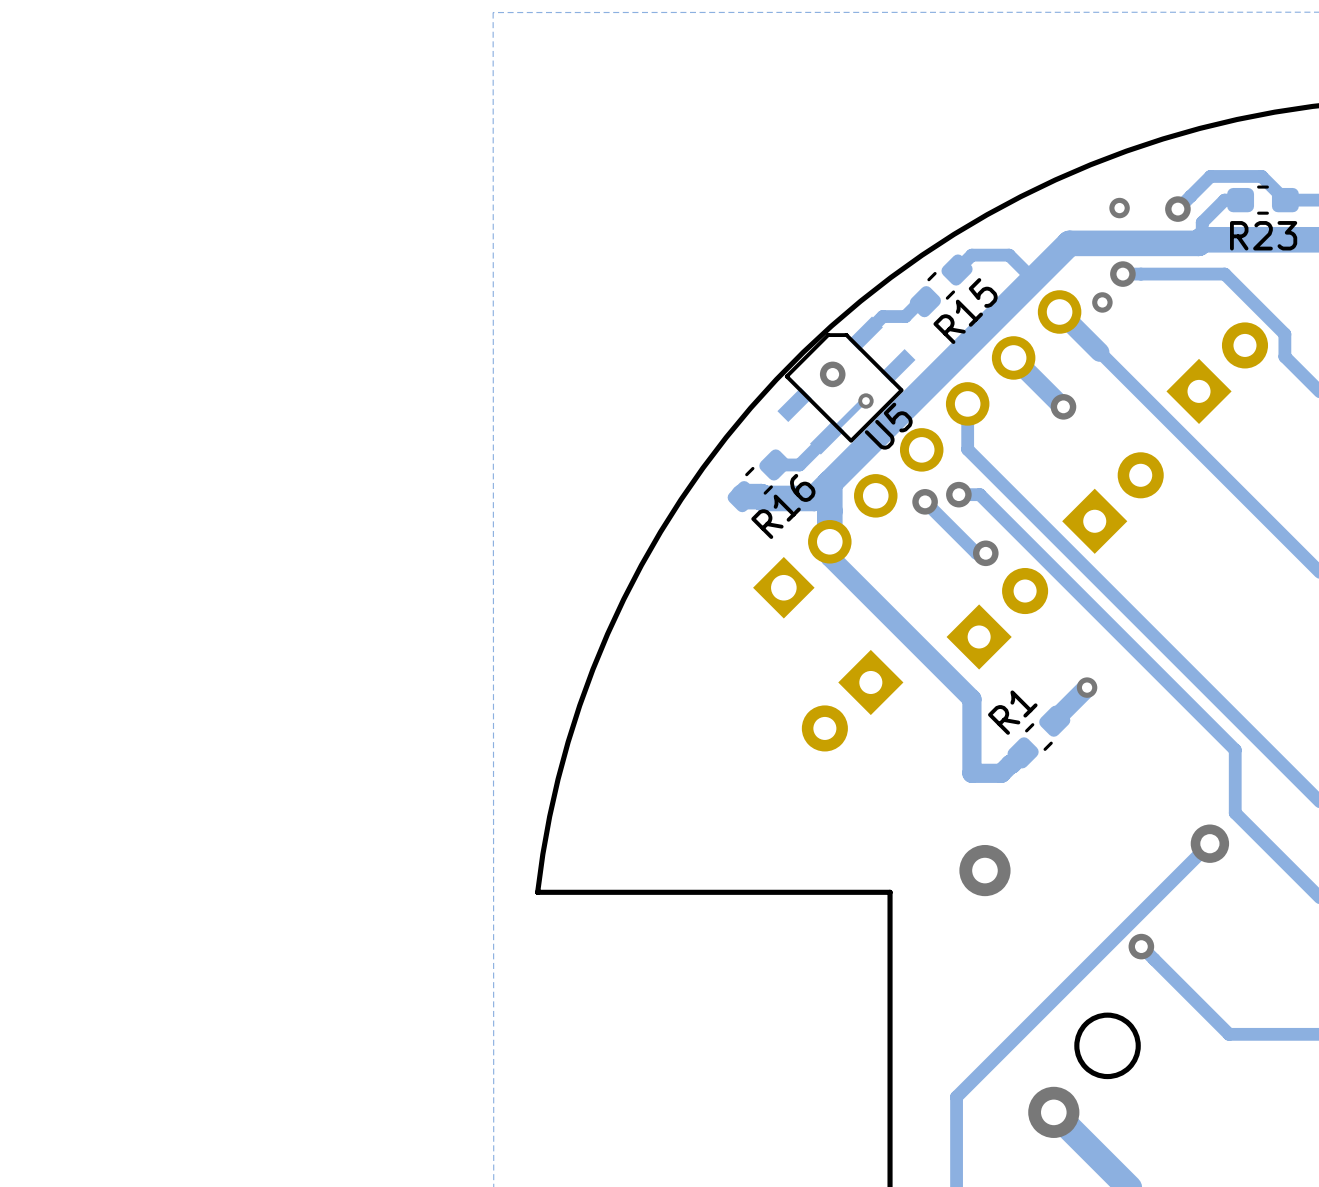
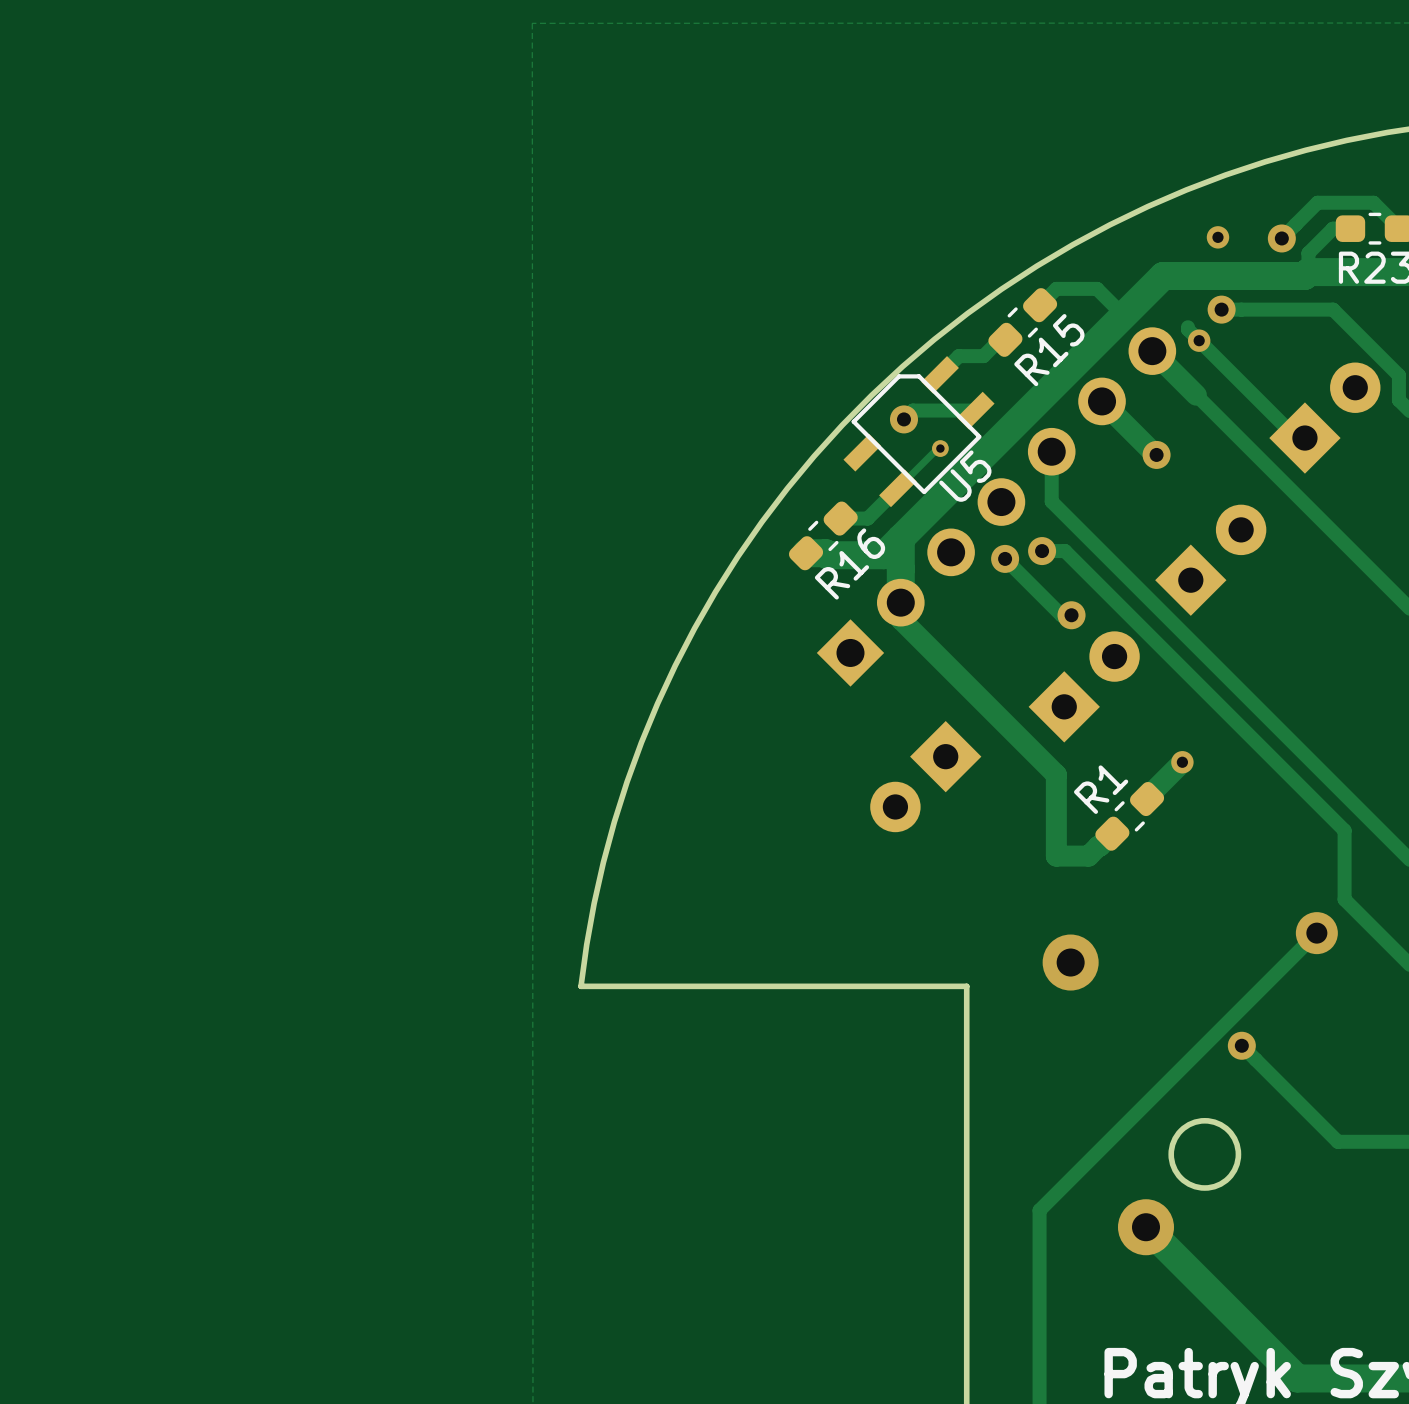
track: none -> (1187, 327) (1187, 329) (1296, 438) (1304, 438)
track: none -> (975, 410) (912, 410) (903, 419)

